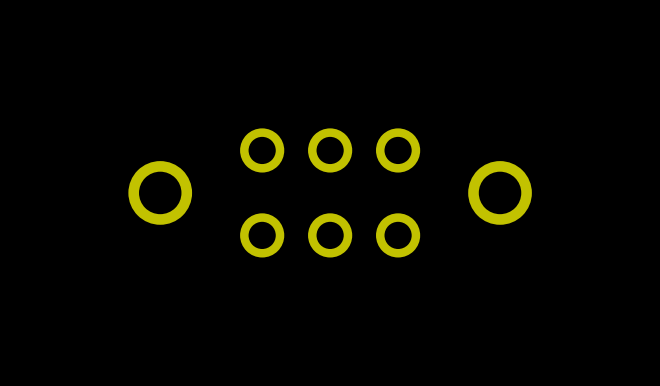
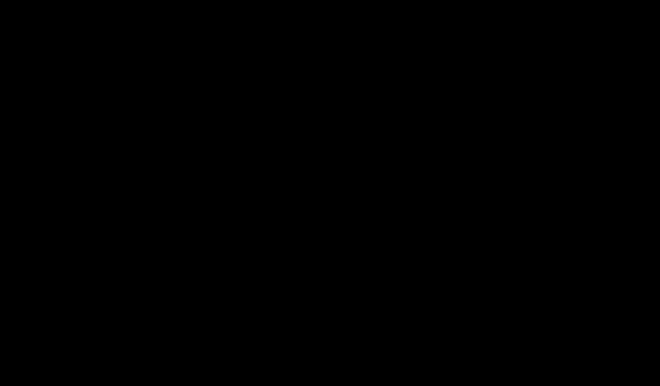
part: (330, 192) -> none

